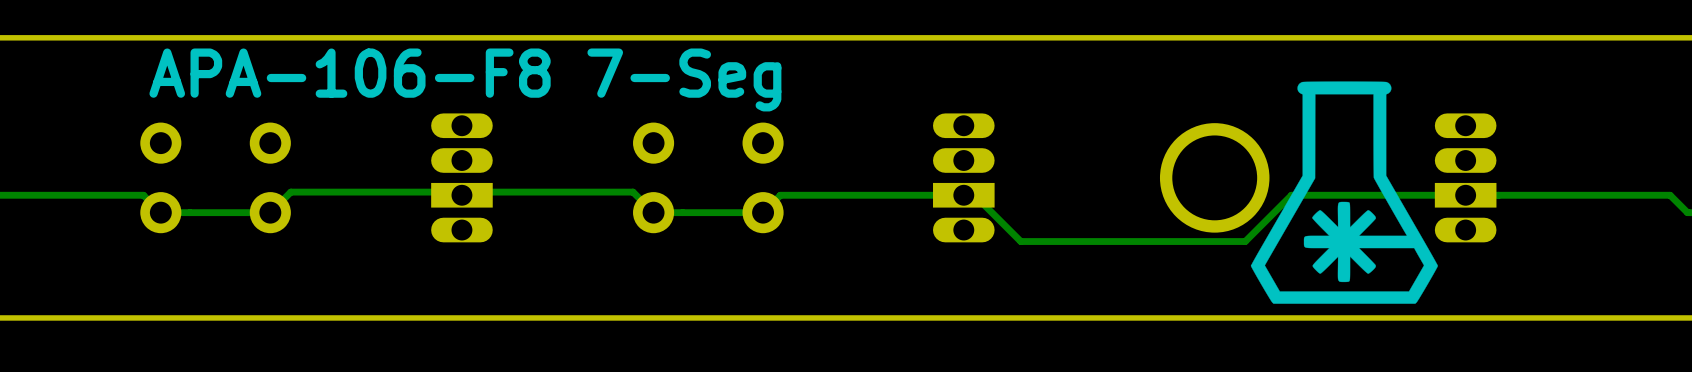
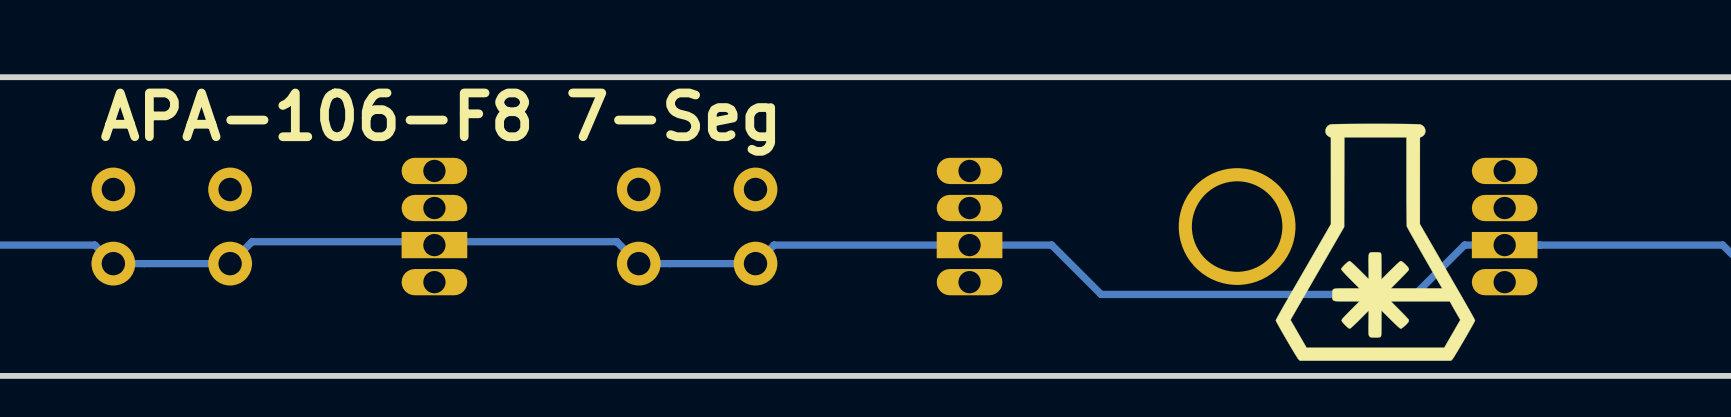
track: (974, 195) (1020, 241) (1087, 241) -> (981, 245) (1051, 245) (1101, 294)
track: (1428, 195) (1291, 195) (1245, 241) -> (1464, 245) (1415, 294) (1269, 294)

